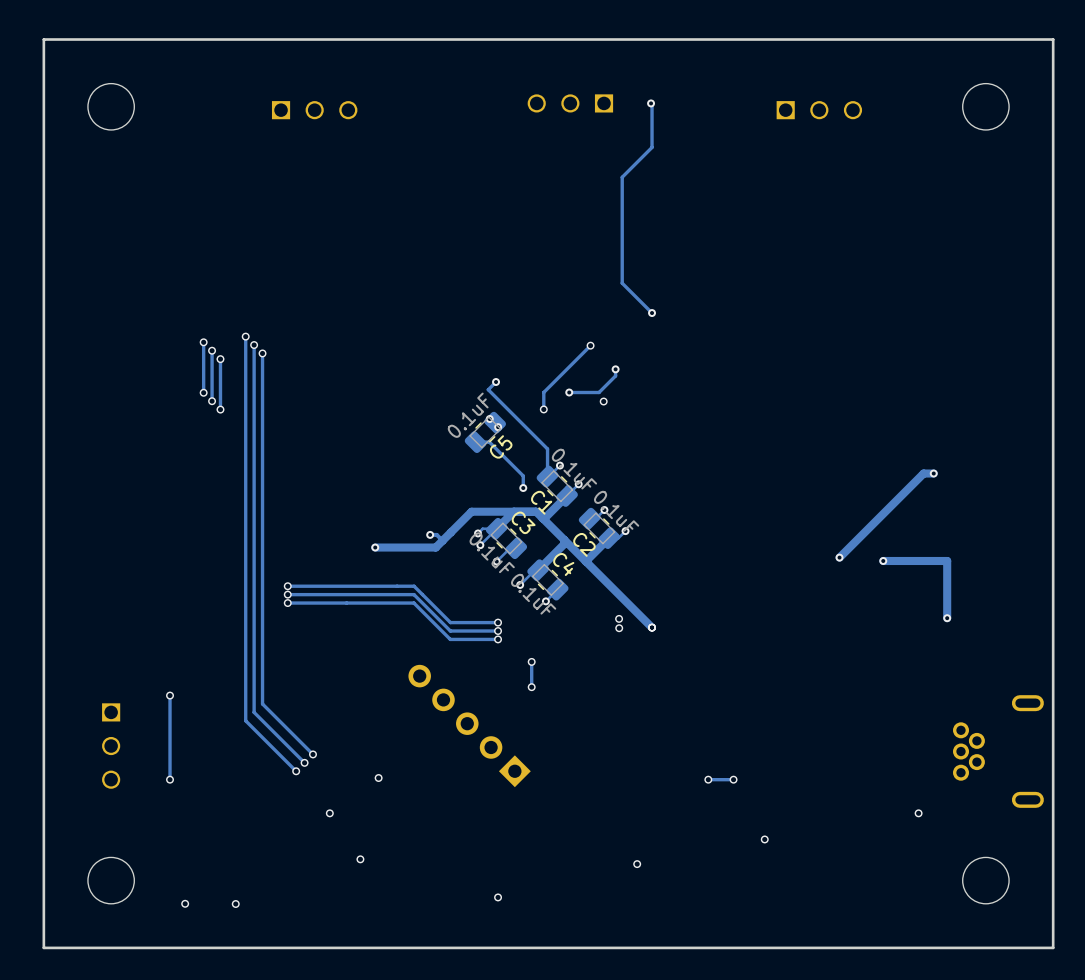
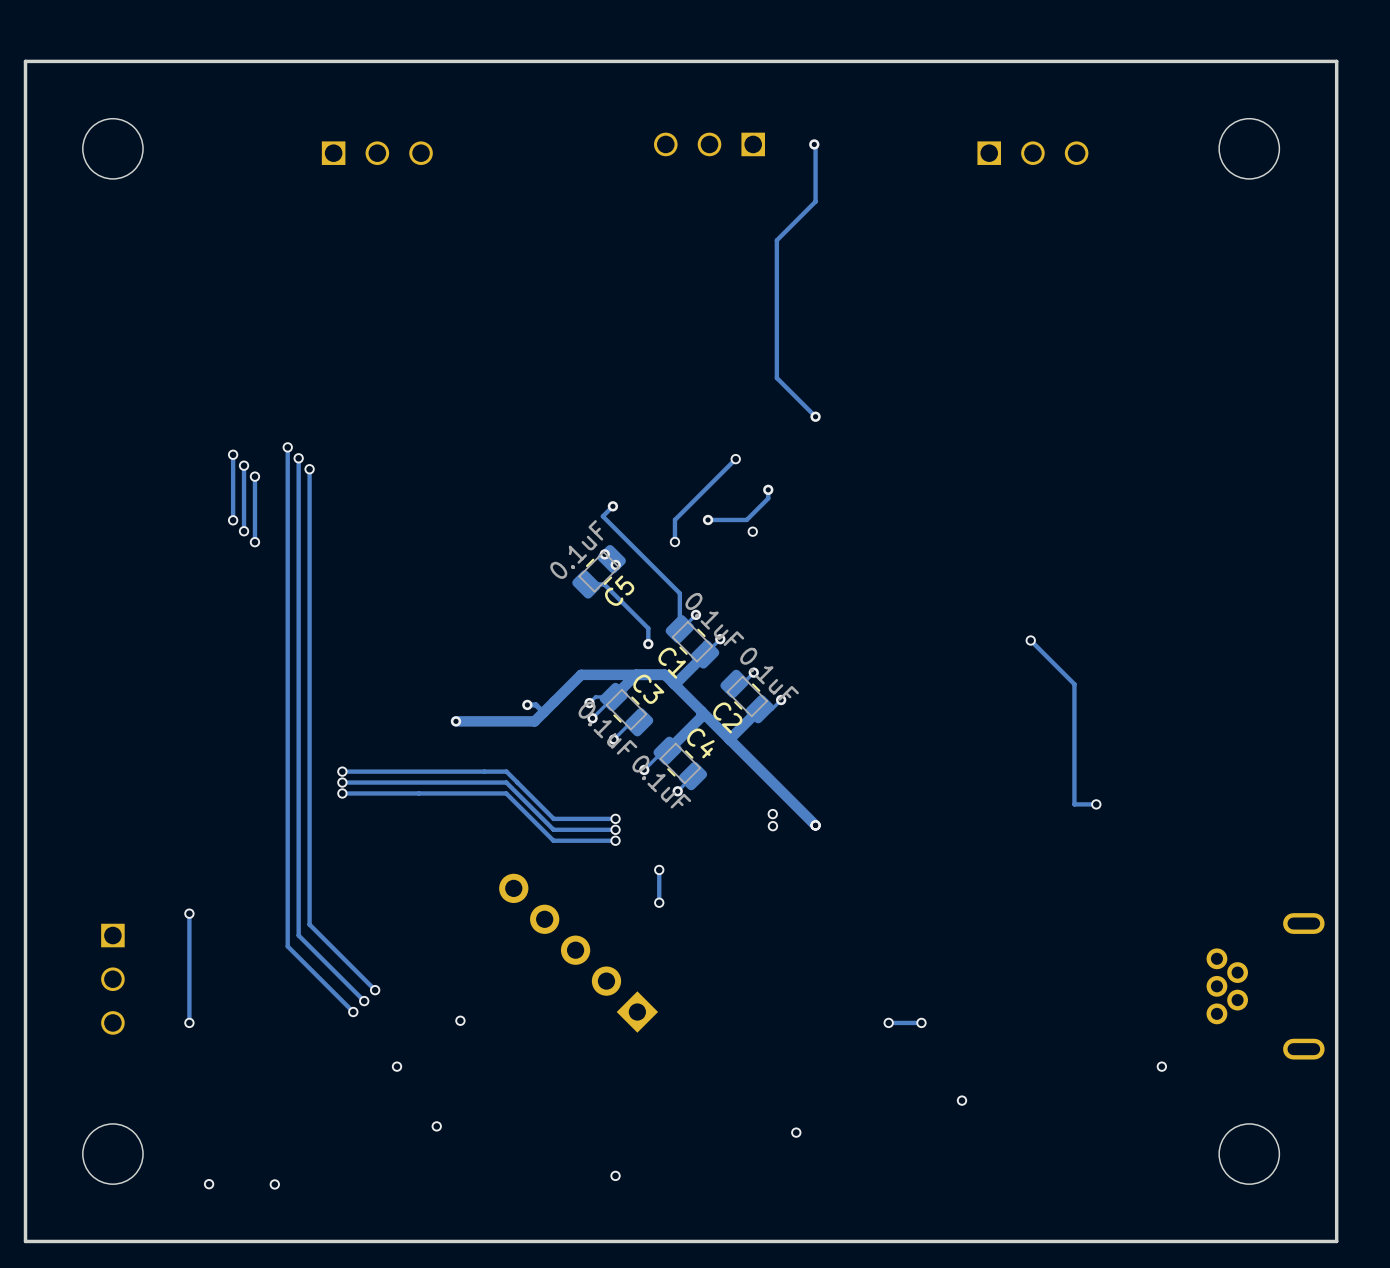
track: (933, 473) (923, 473) (839, 557) -> none
via: (933, 473) -> none
track: none -> (1030, 640) (1074, 684) (1074, 804) (1096, 804)
via: none -> (1030, 640)
via: (839, 557) -> none
track: (883, 560) (947, 560) (947, 618) -> none
via: (883, 560) -> none
via: none -> (1096, 804)
via: (947, 618) -> none

